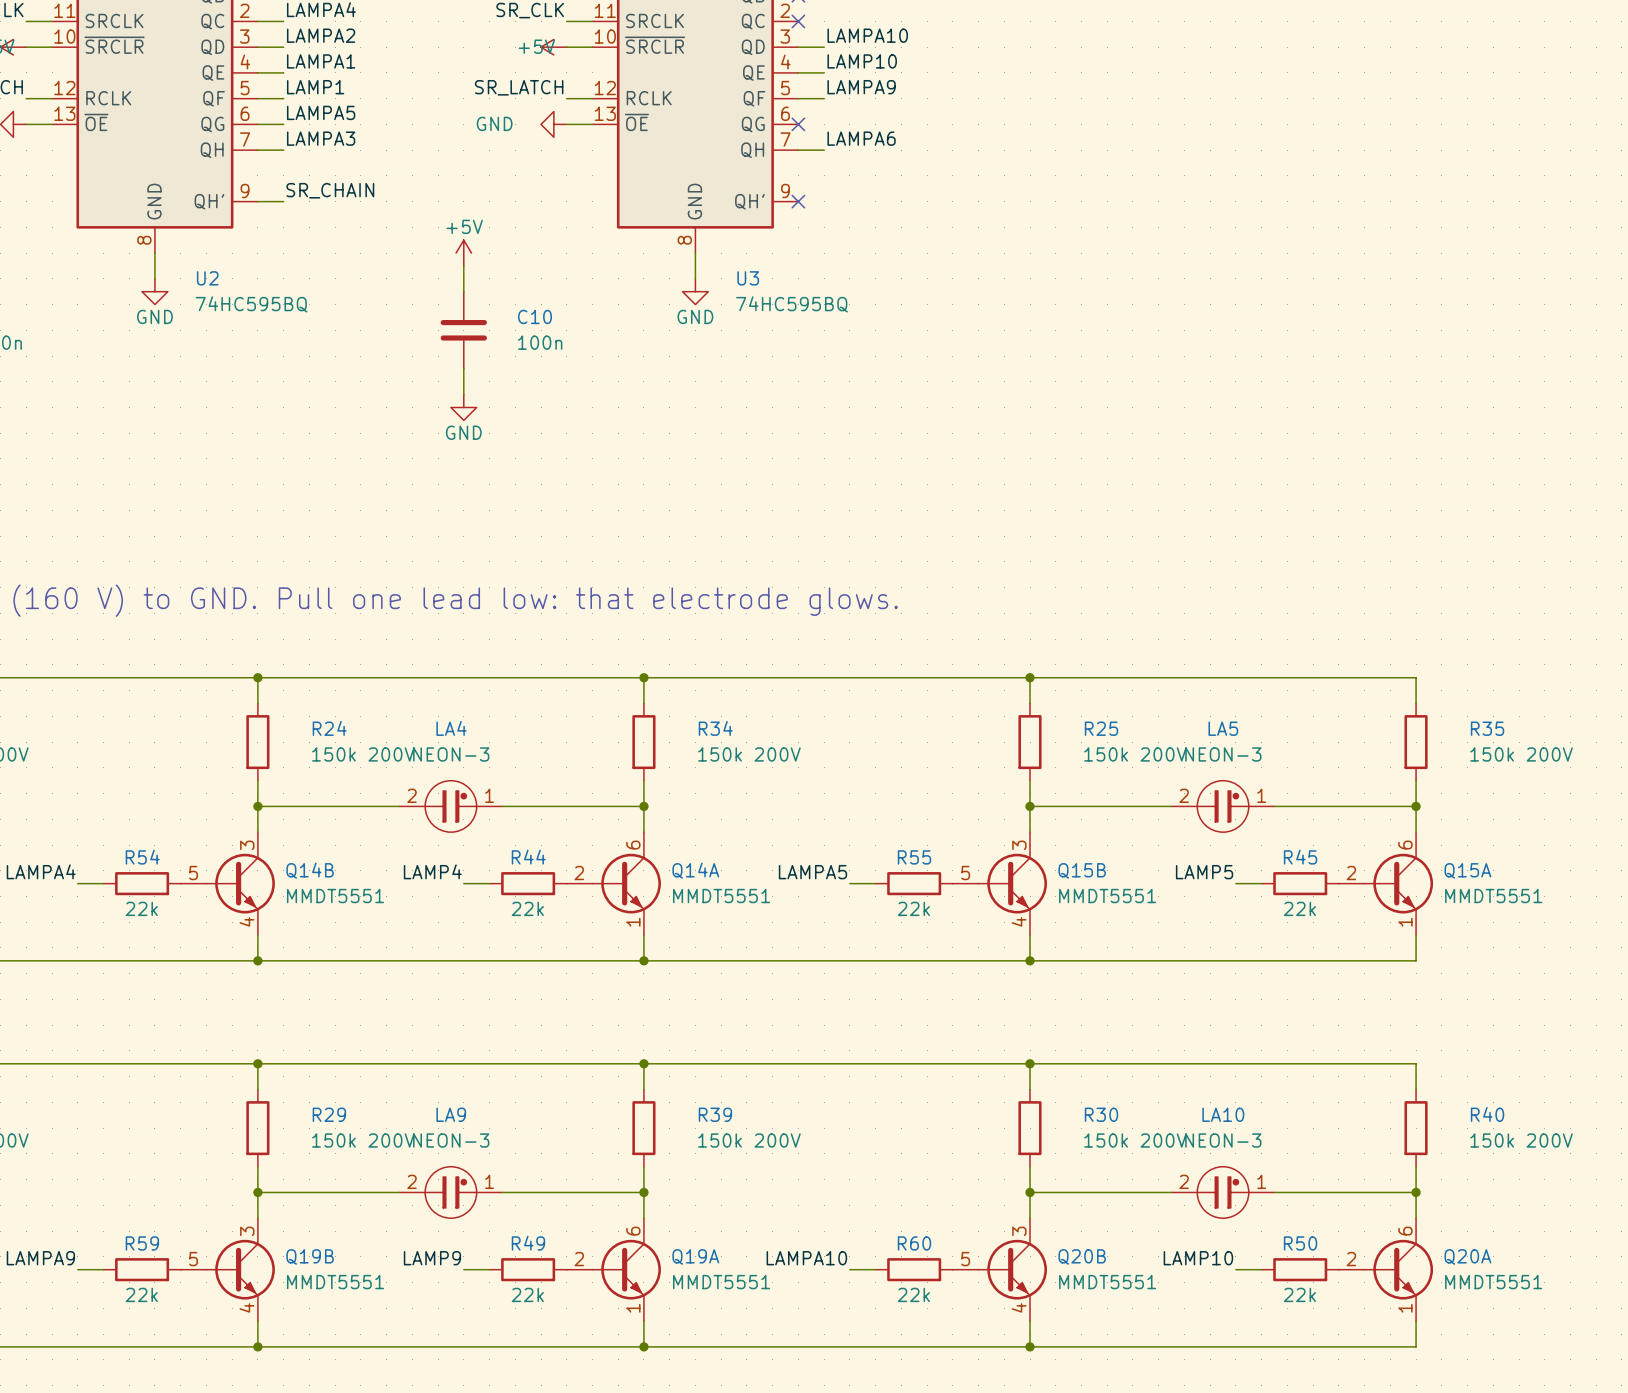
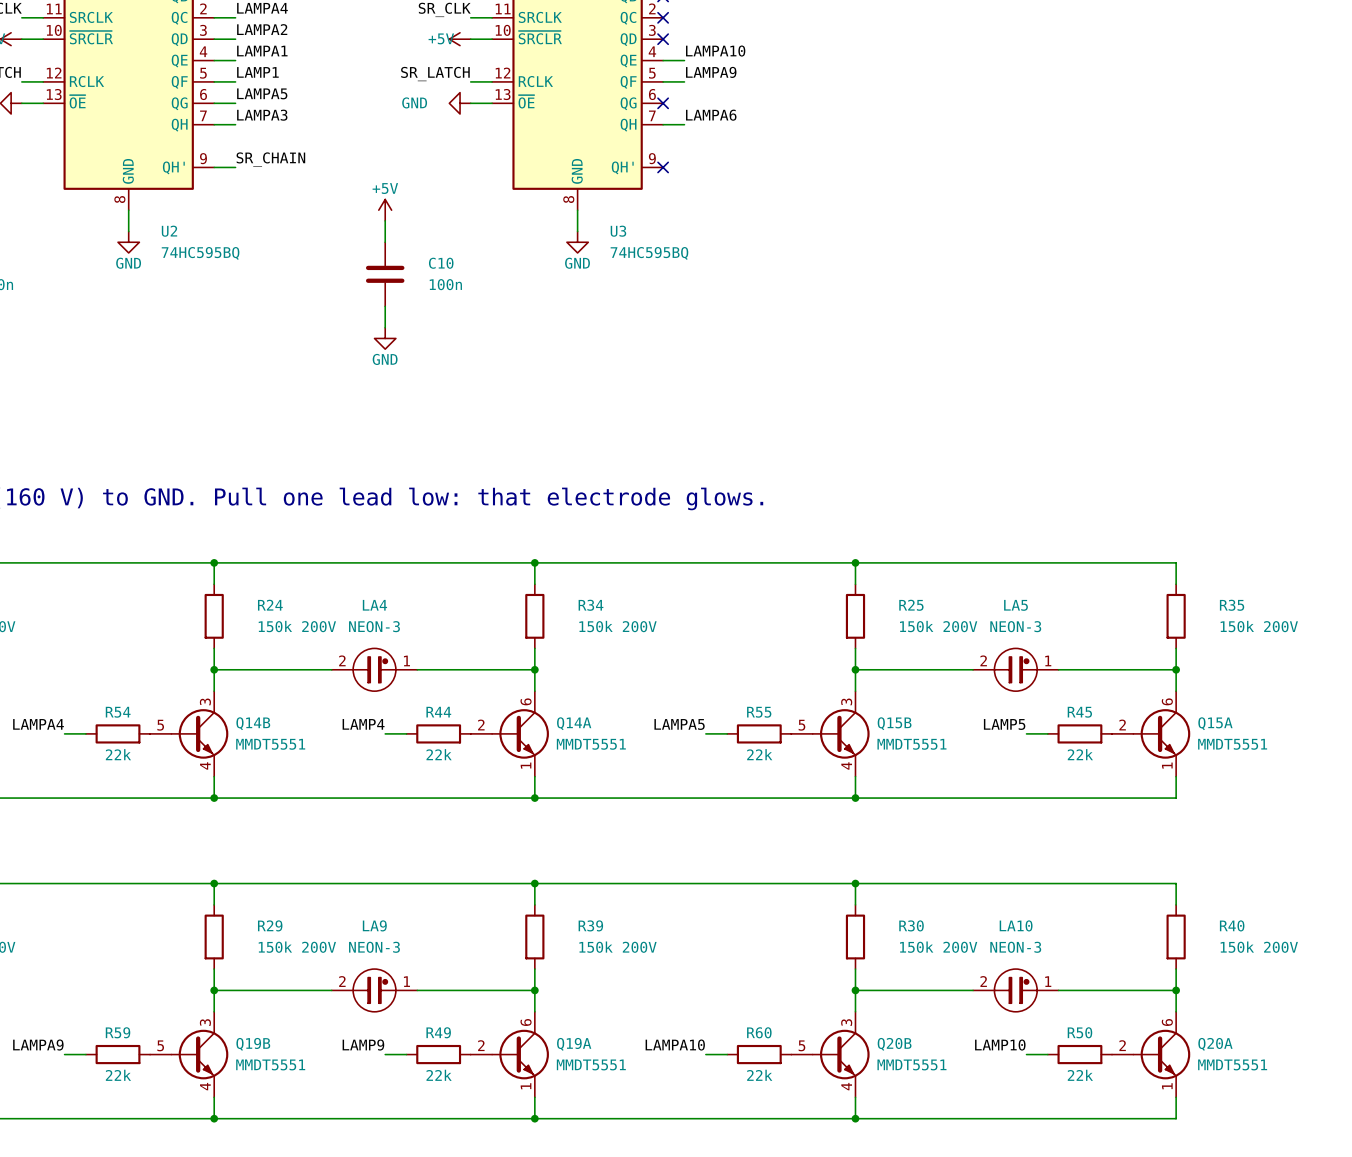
label: LAMPA10 (867, 35) -> none
wire: (798, 47) (824, 47) -> none
no-connect mark: none -> (663, 39)
label: LAMP10 (862, 61) -> LAMPA10 (715, 51)

